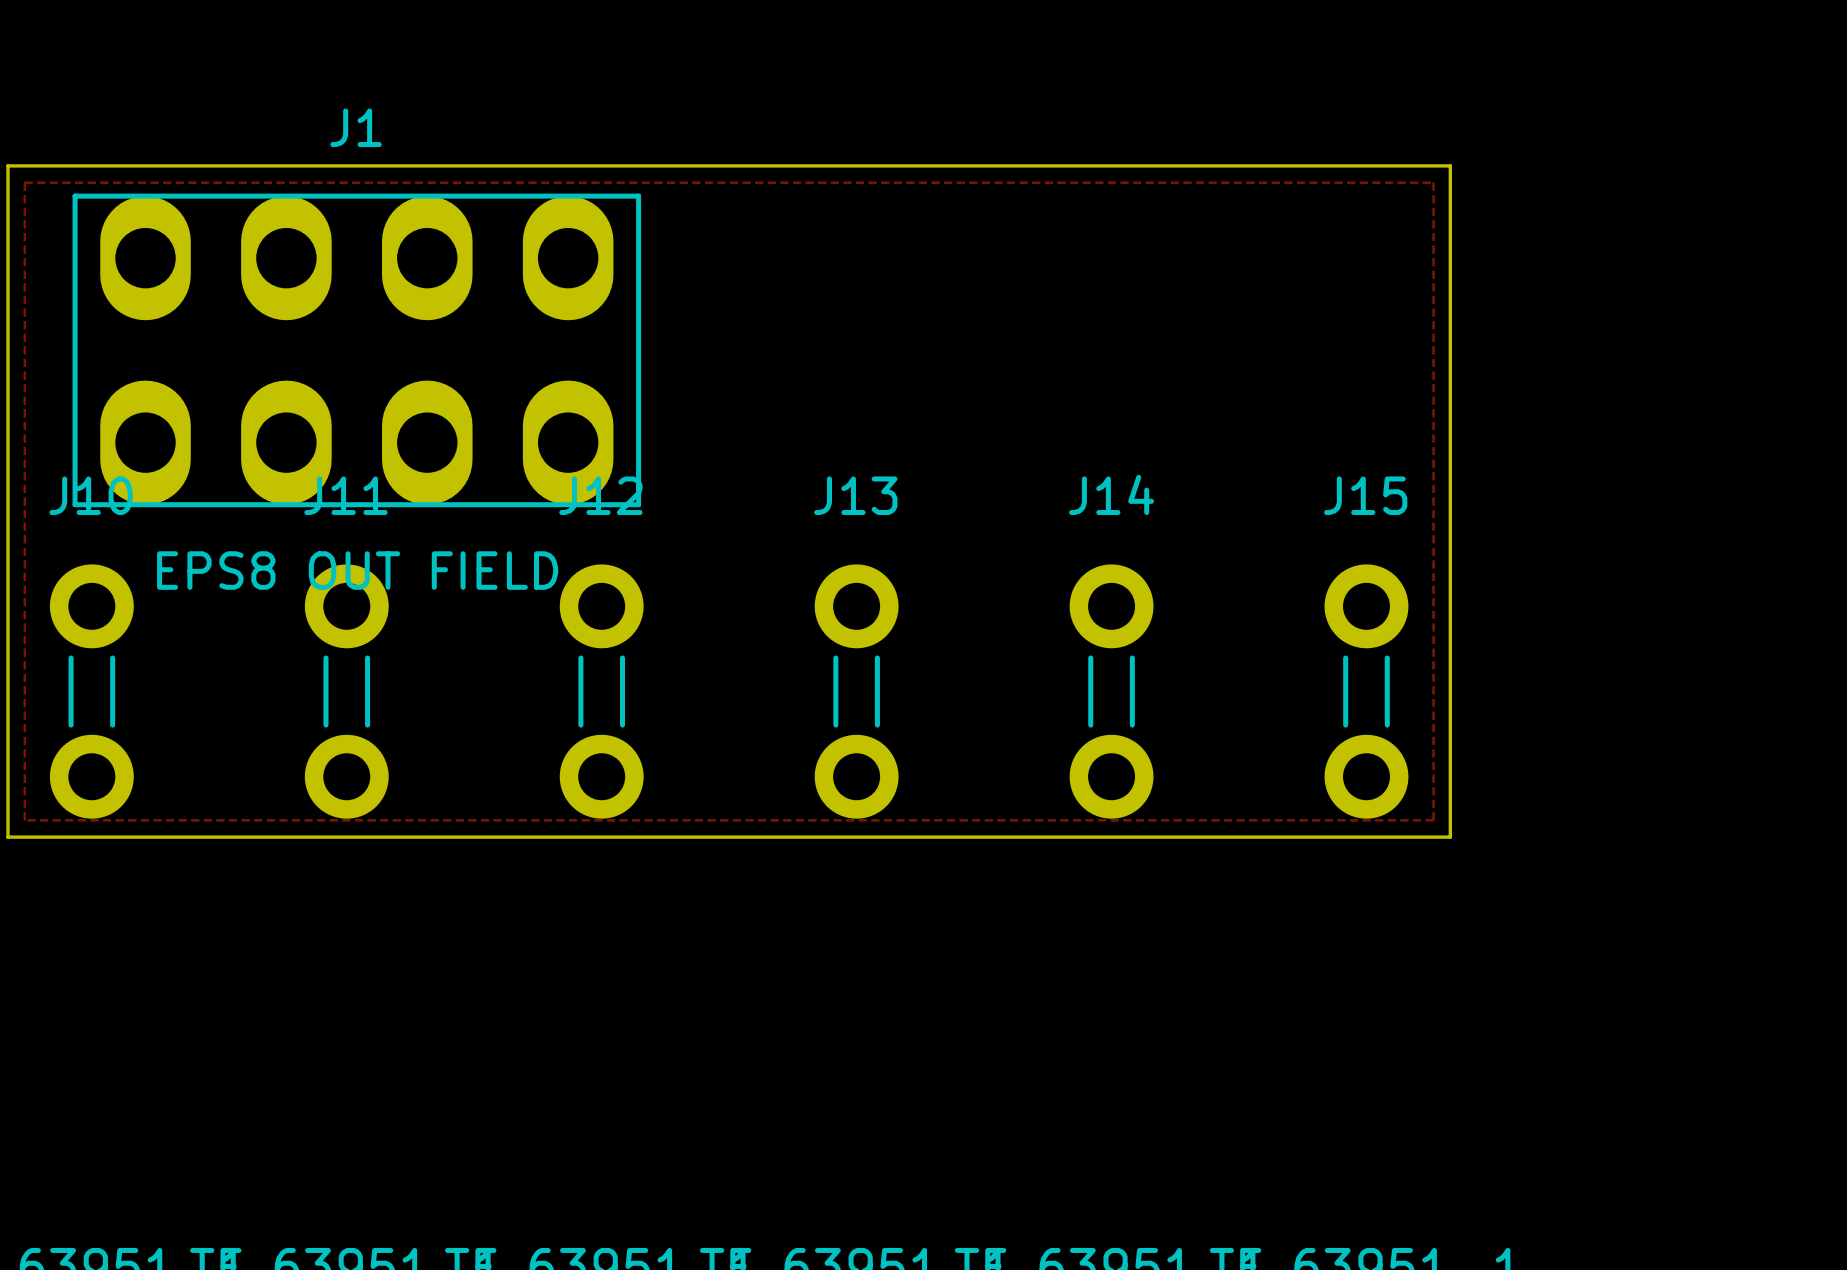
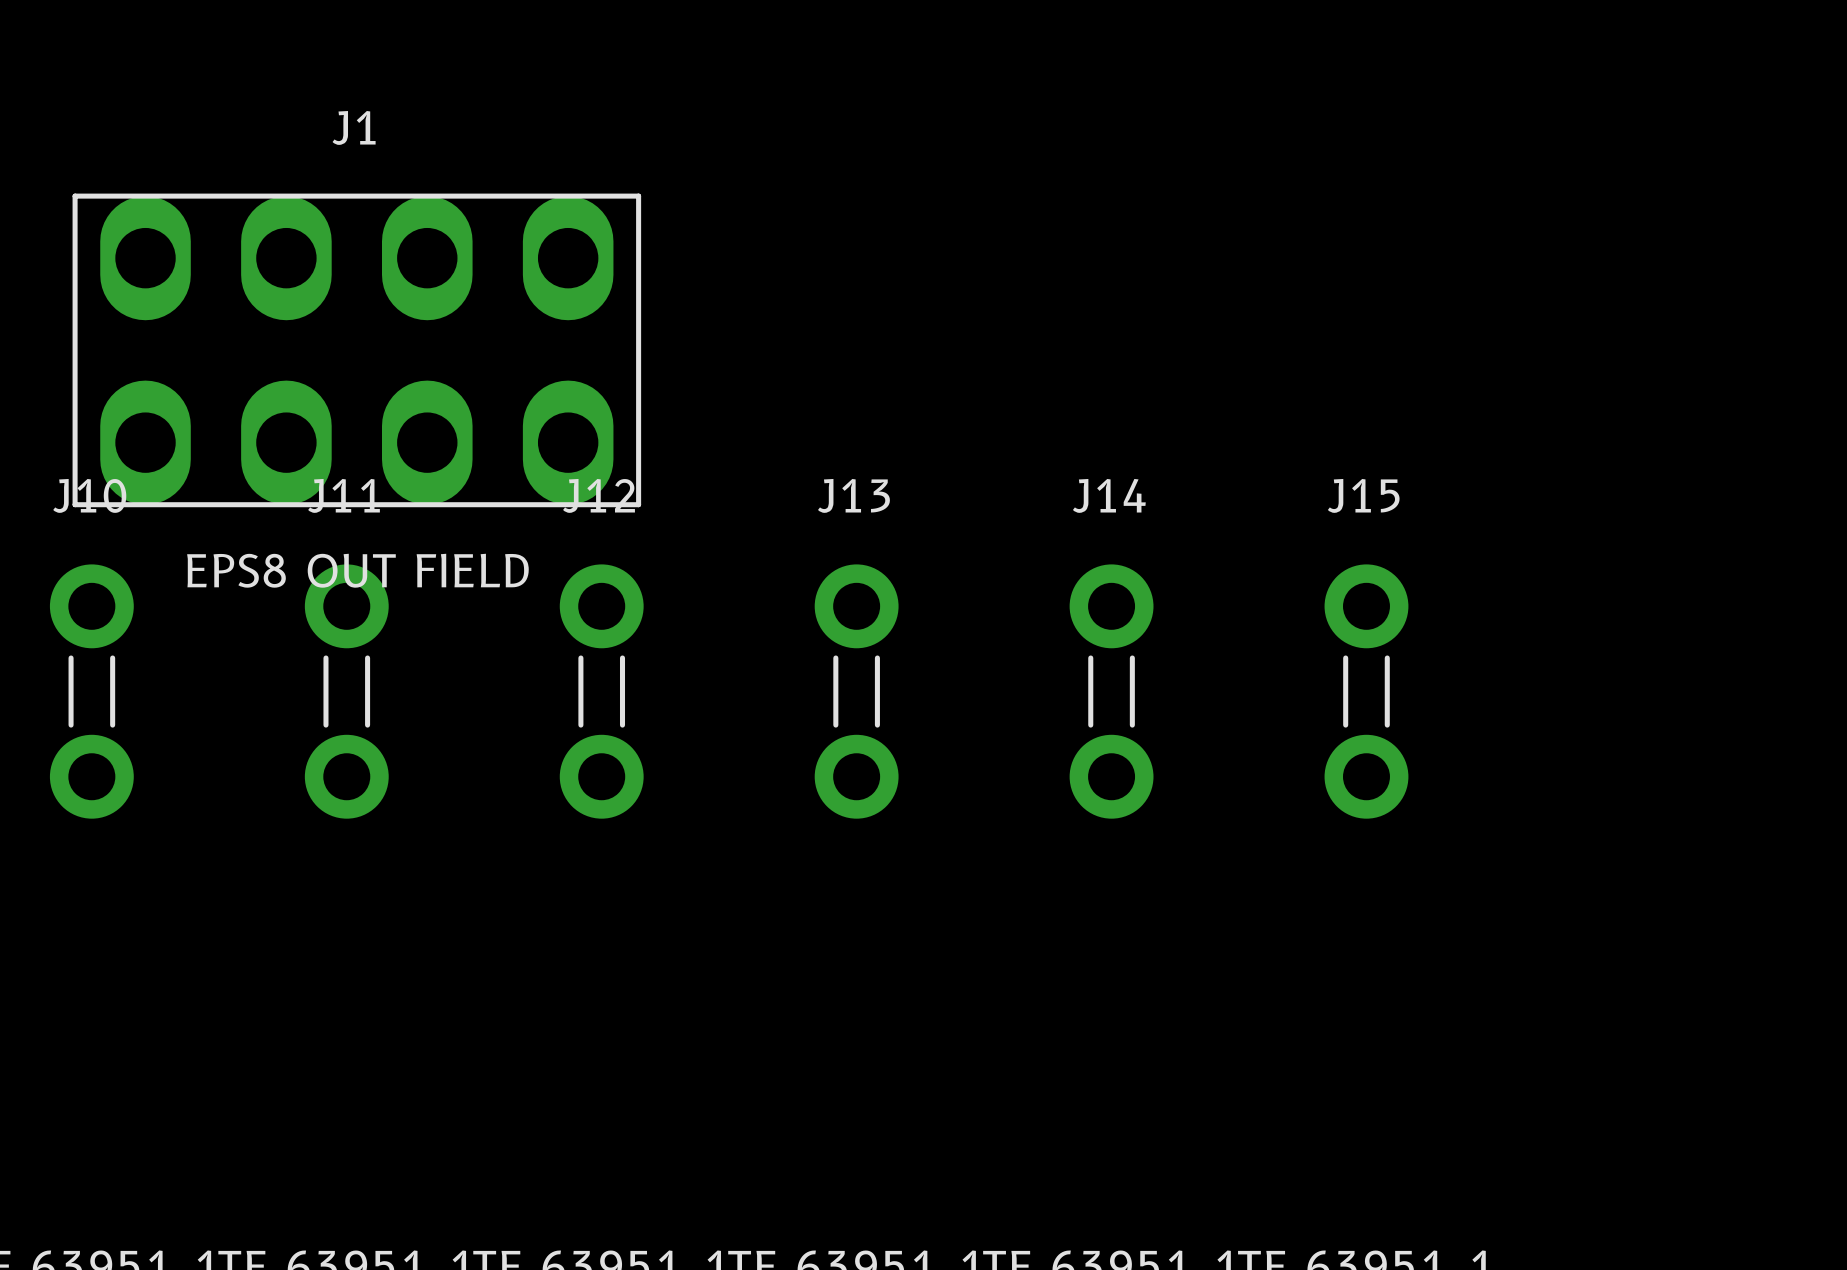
board edge: (7, 165) (1450, 165) (1450, 837) (7, 837) (7, 165) -> none
top zone outline: (24, 182) (1433, 182) (1433, 820) (24, 820) (24, 182) -> none

